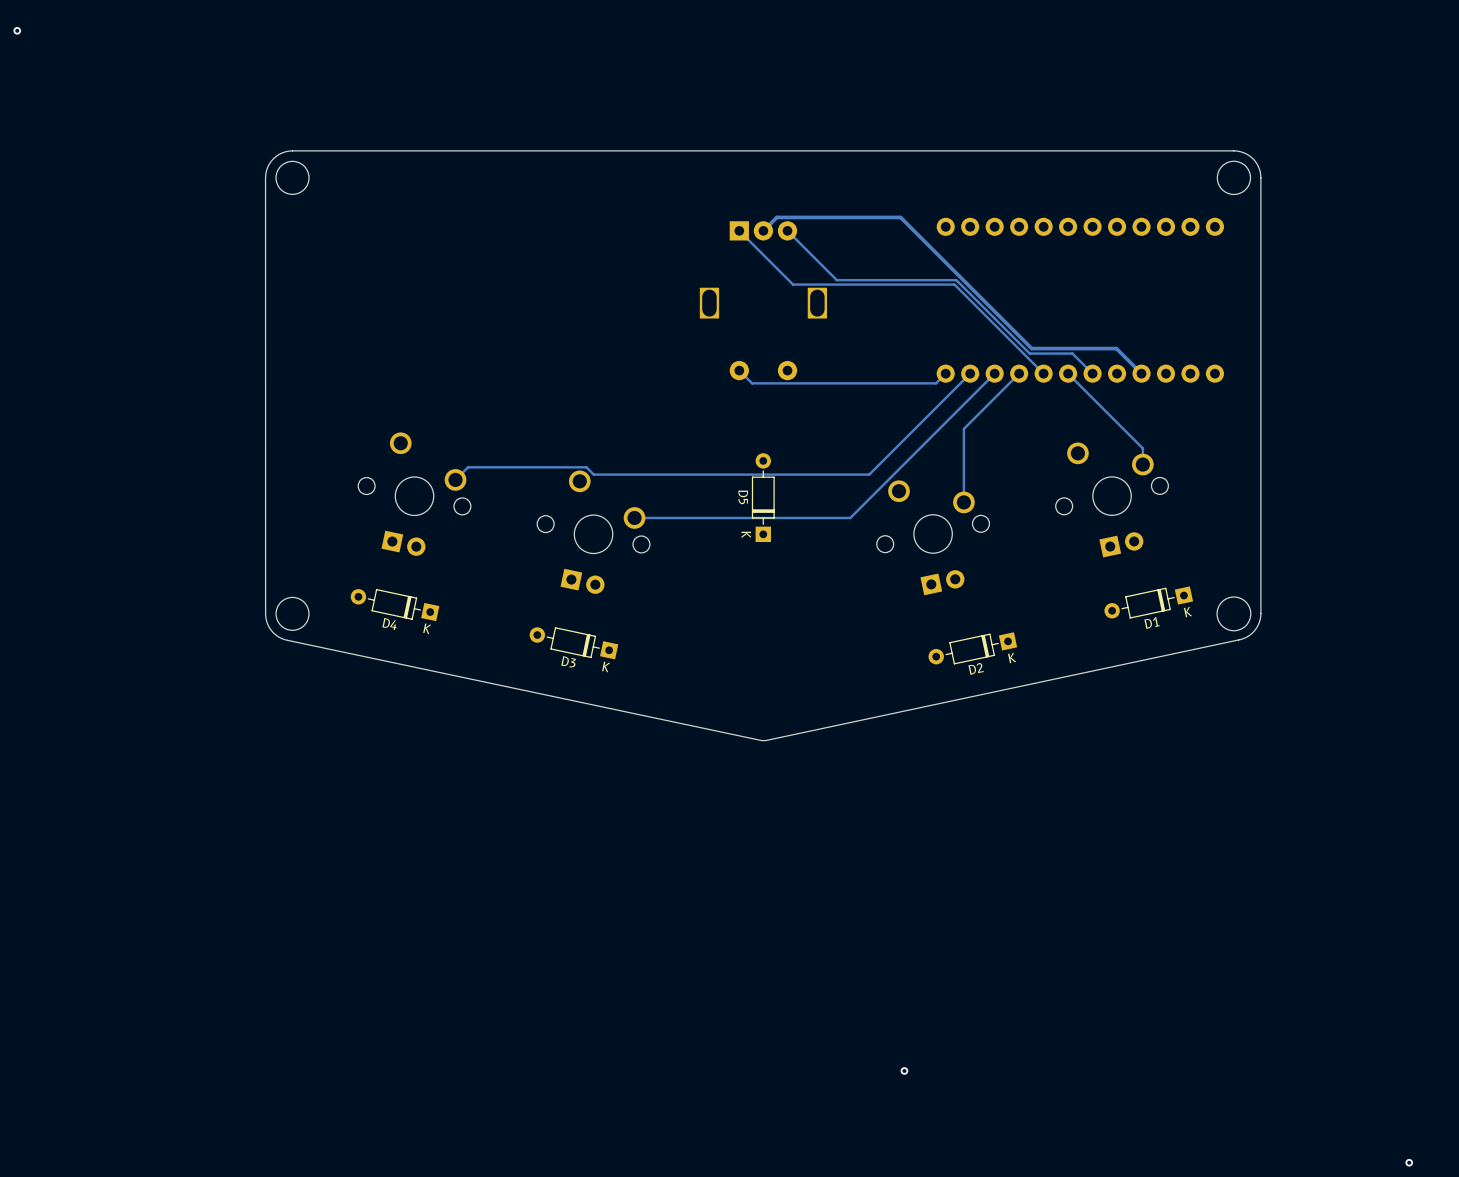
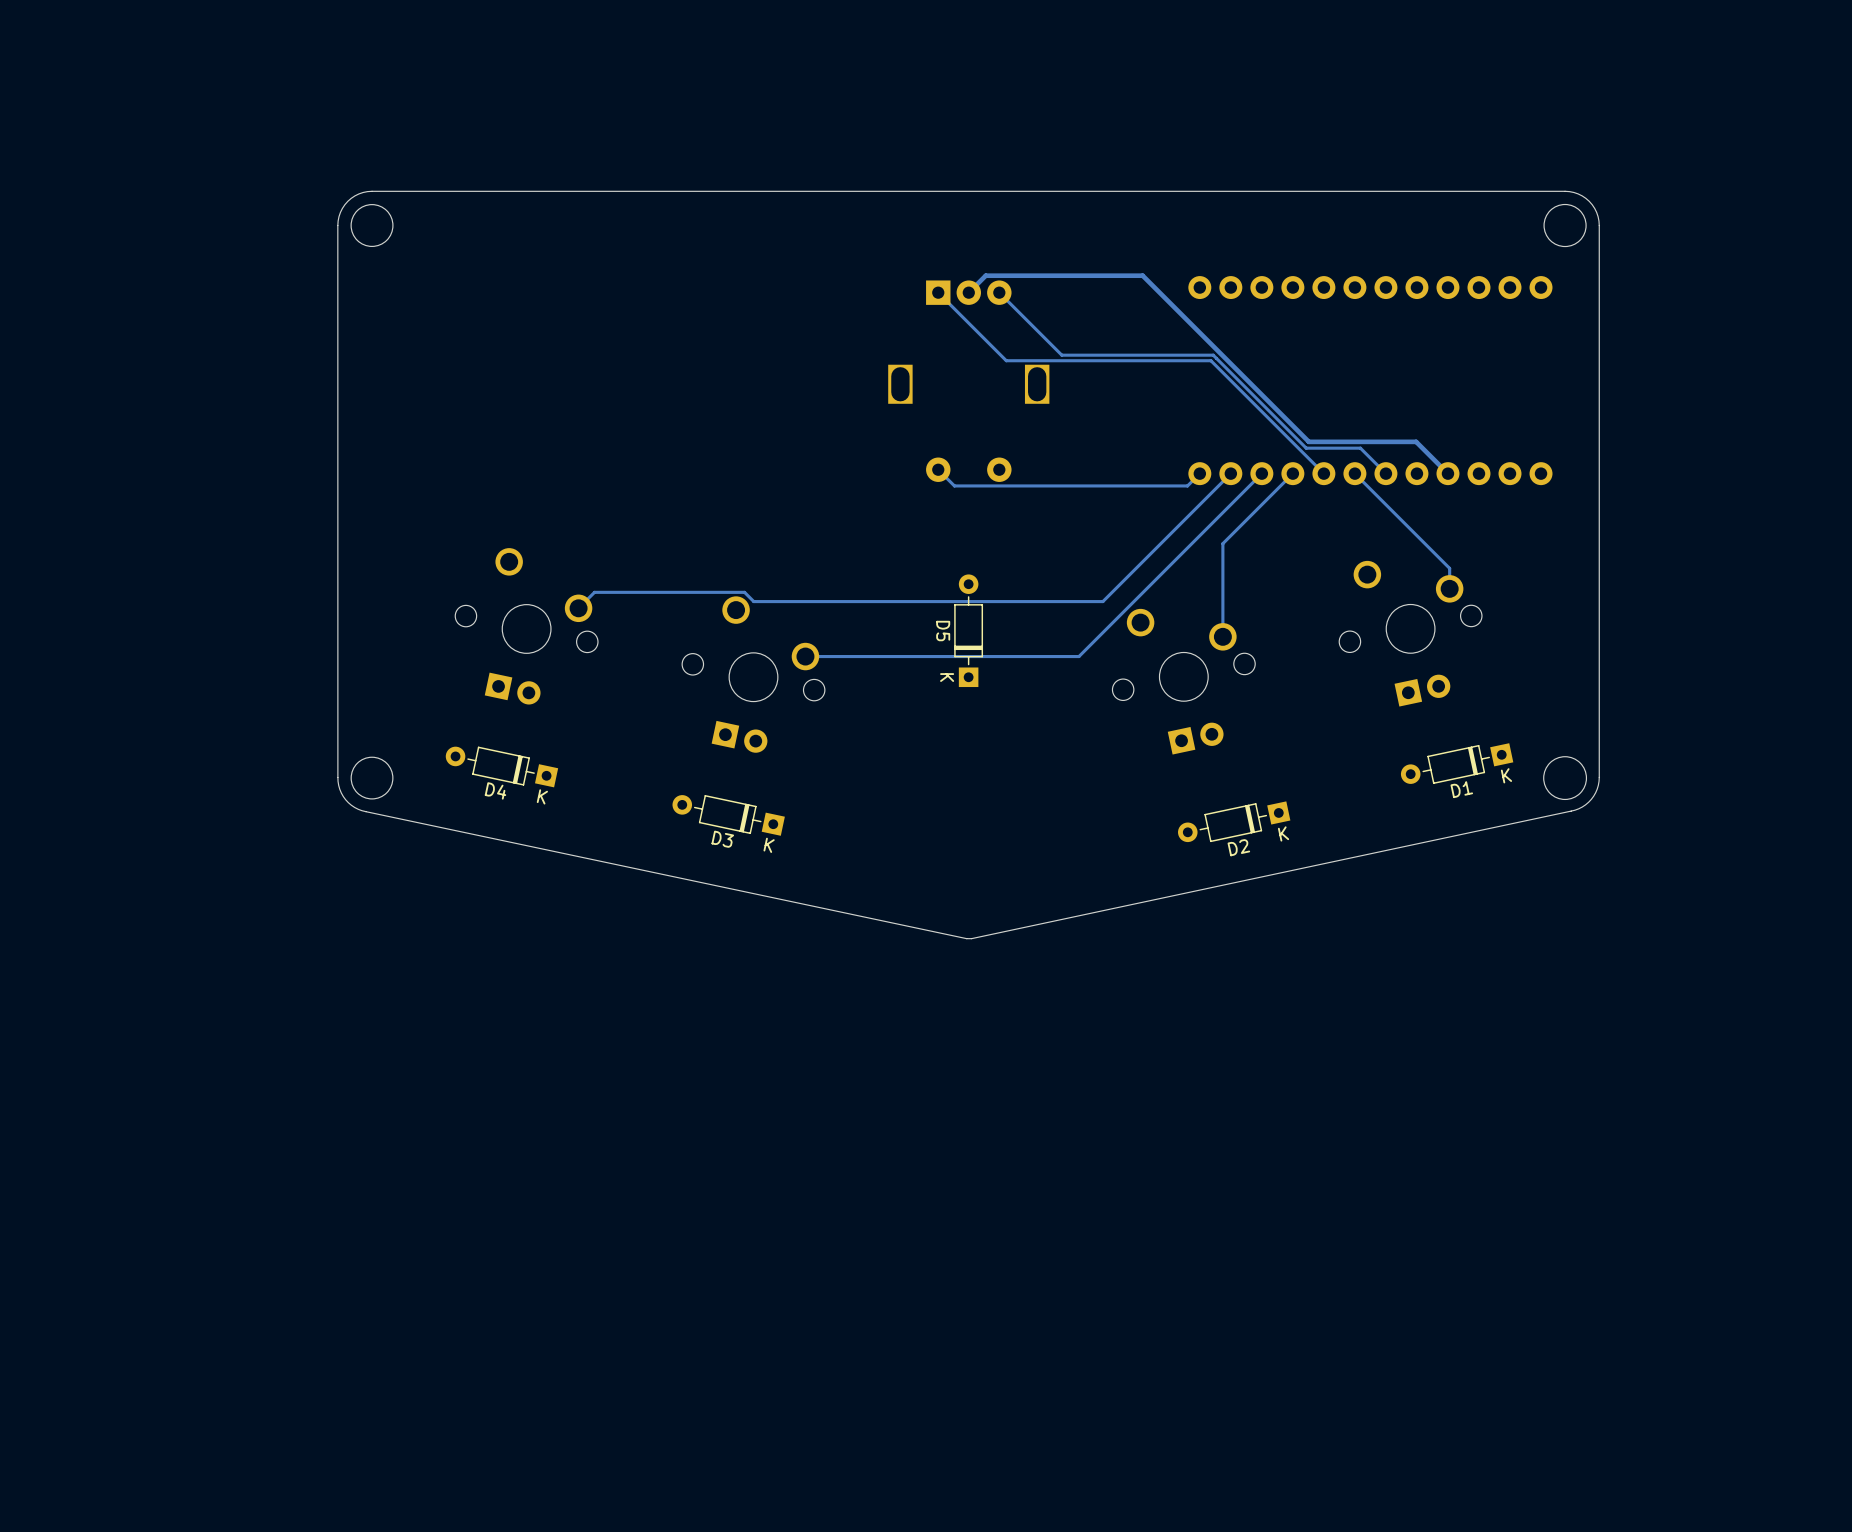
via: (17, 30) -> none
via: (904, 1070) -> none
via: (1409, 1162) -> none

